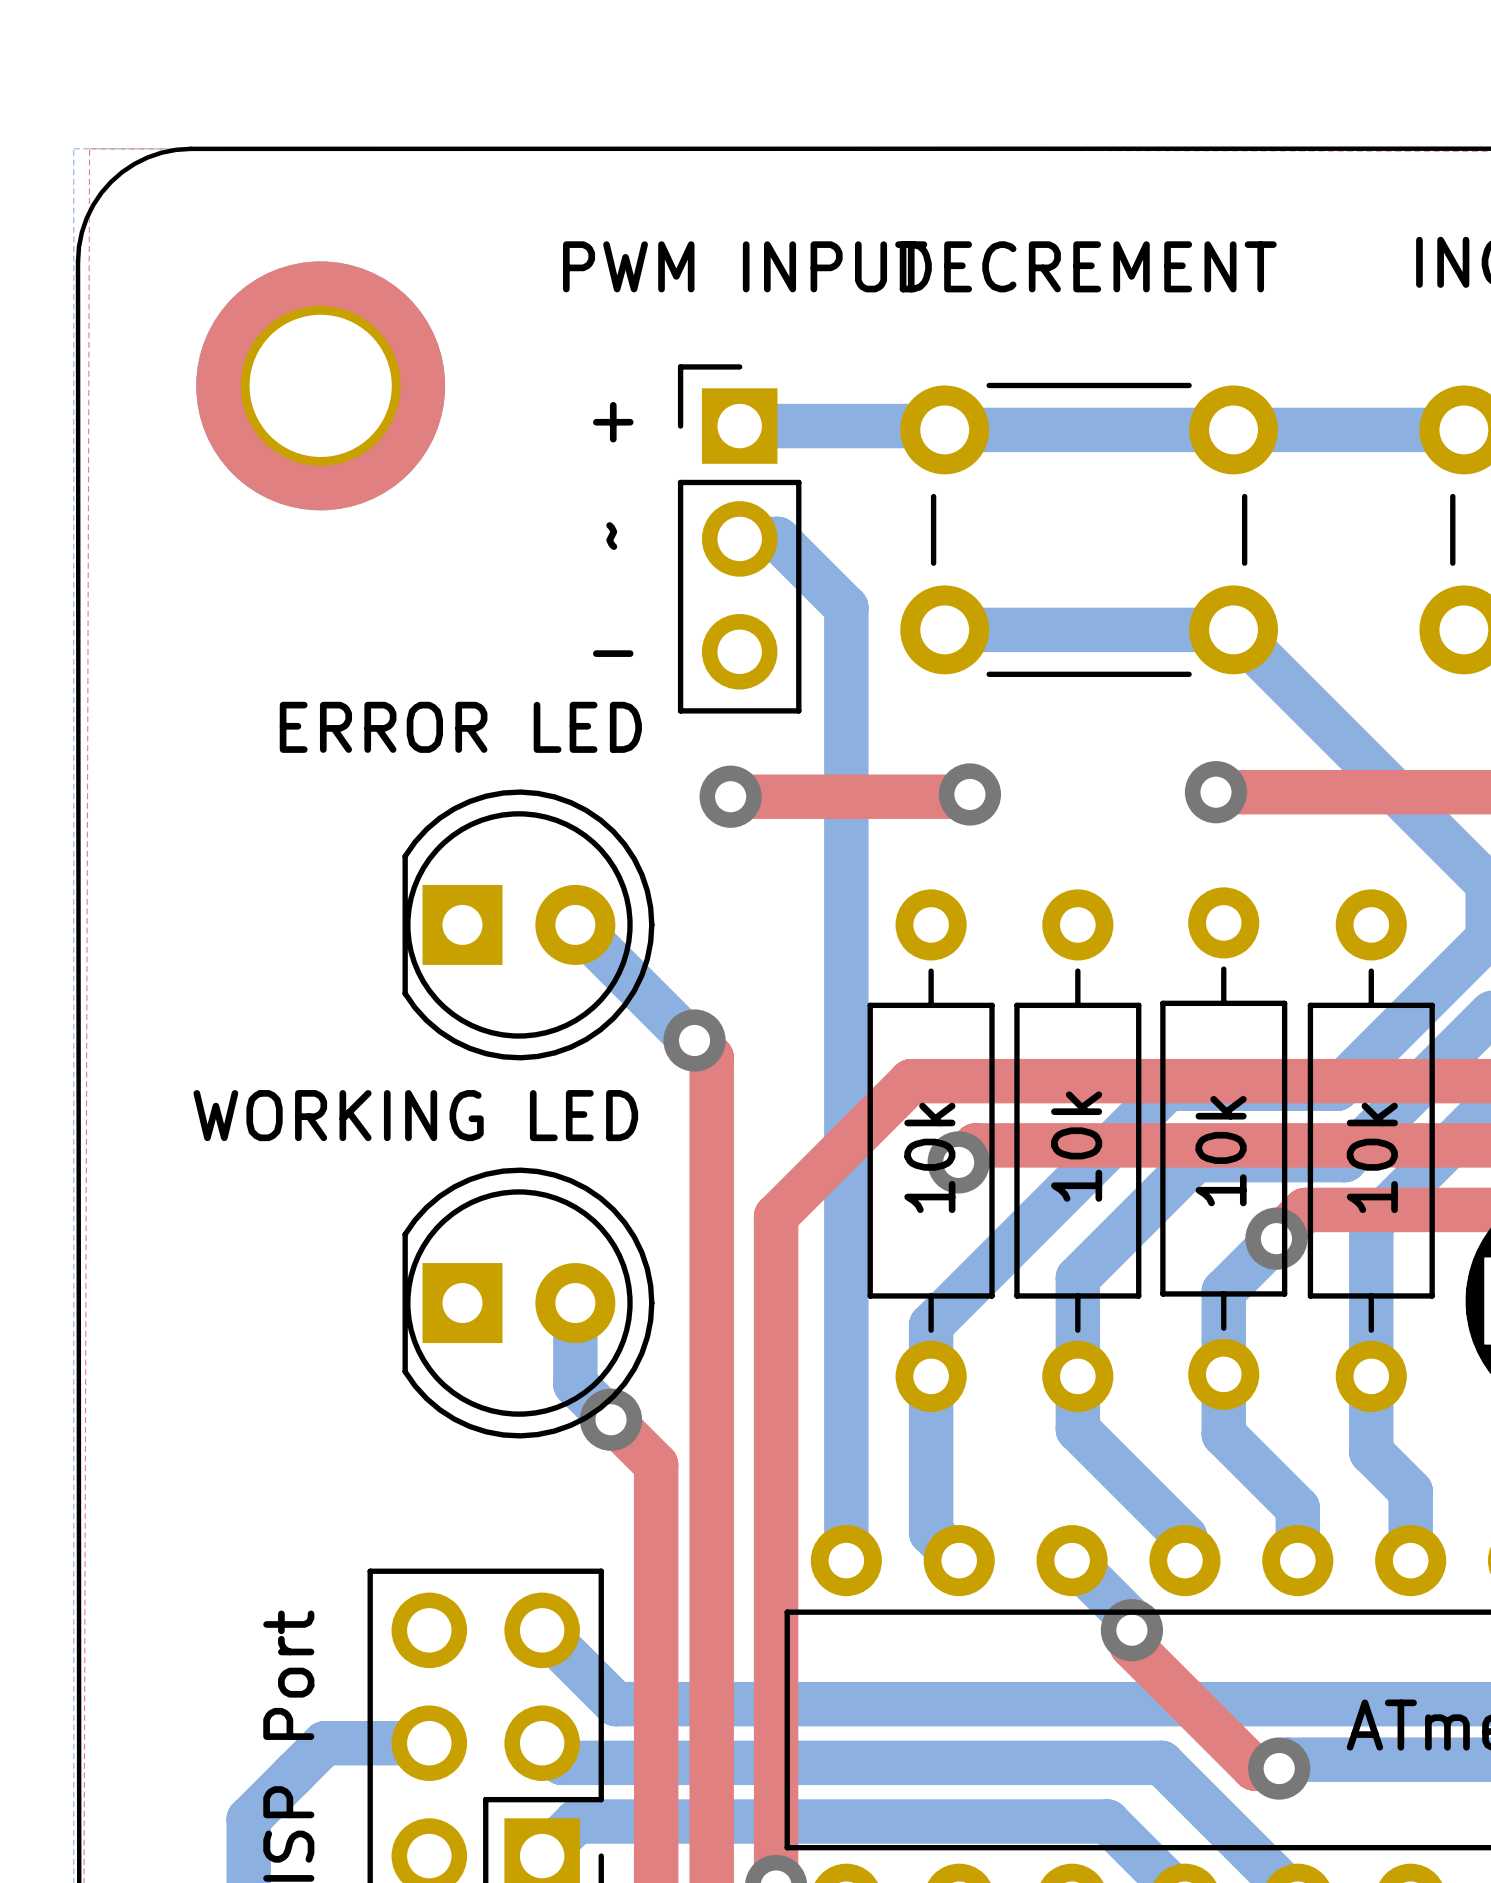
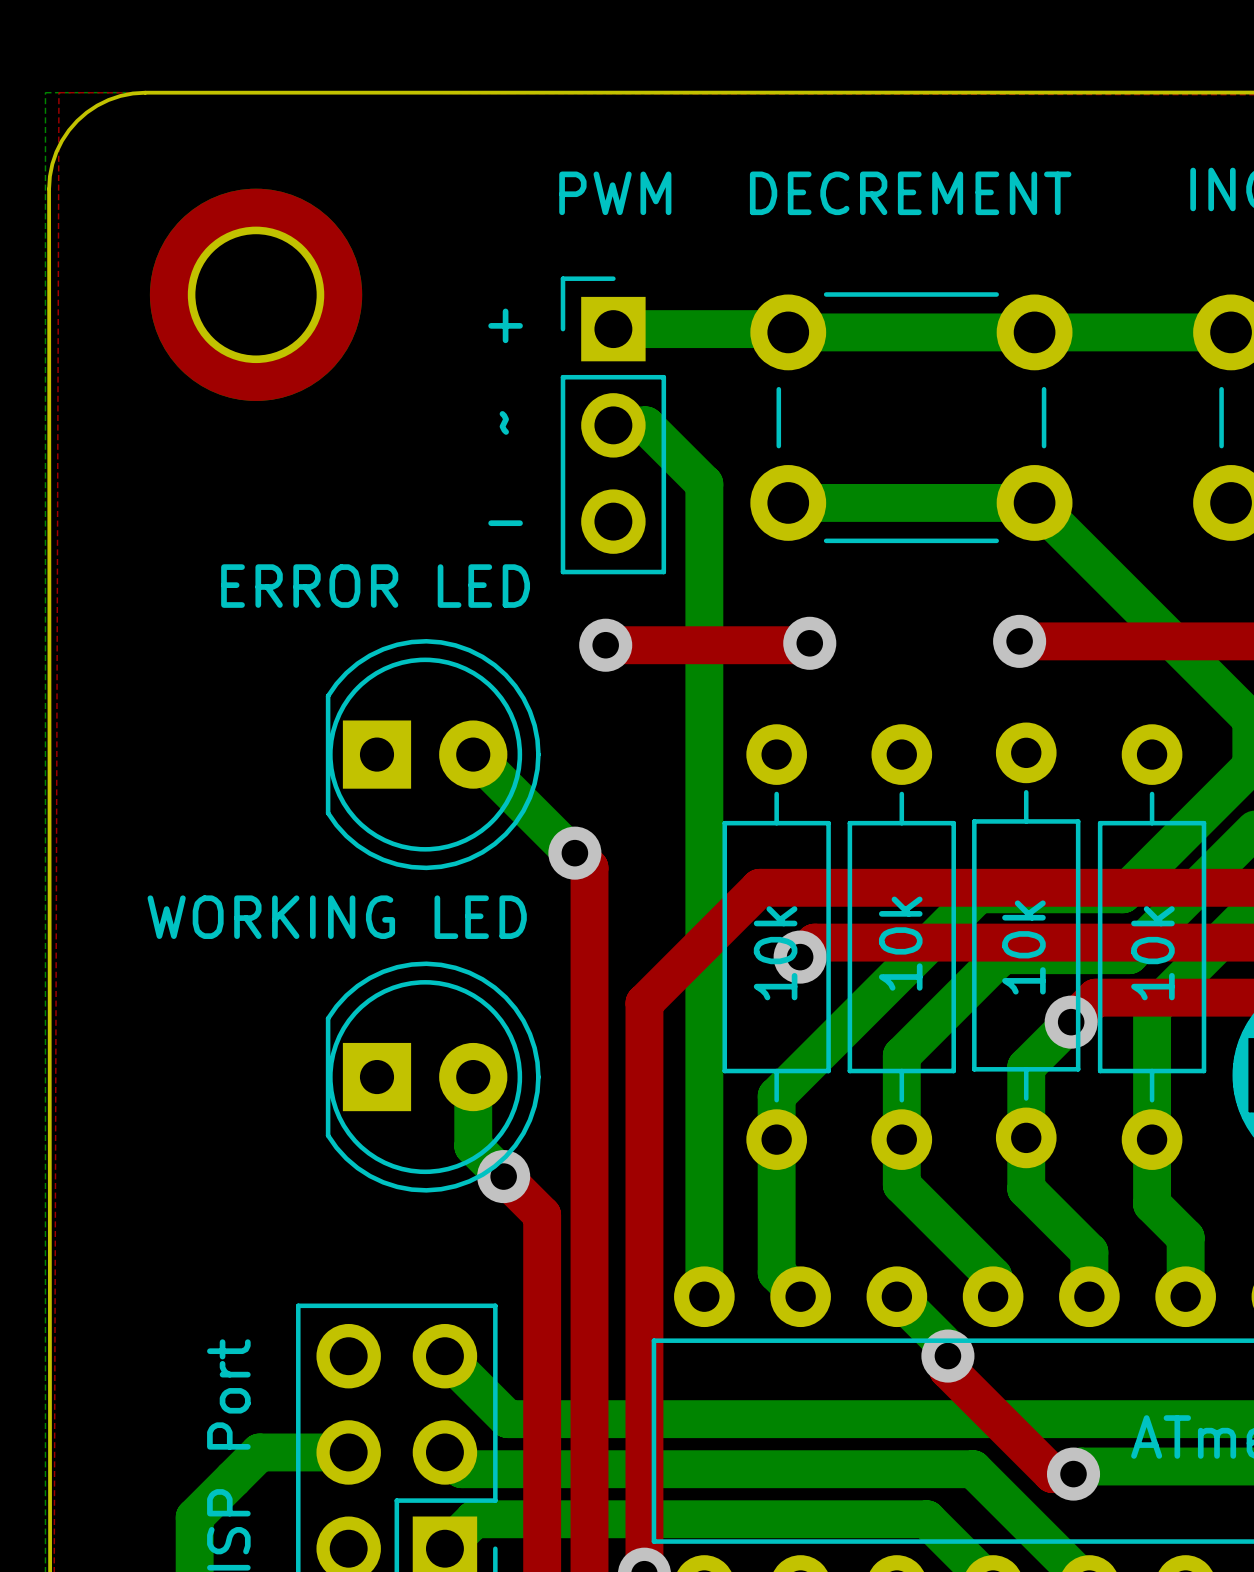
part value: PWM INPUT (745, 266) -> PWM (615, 193)

